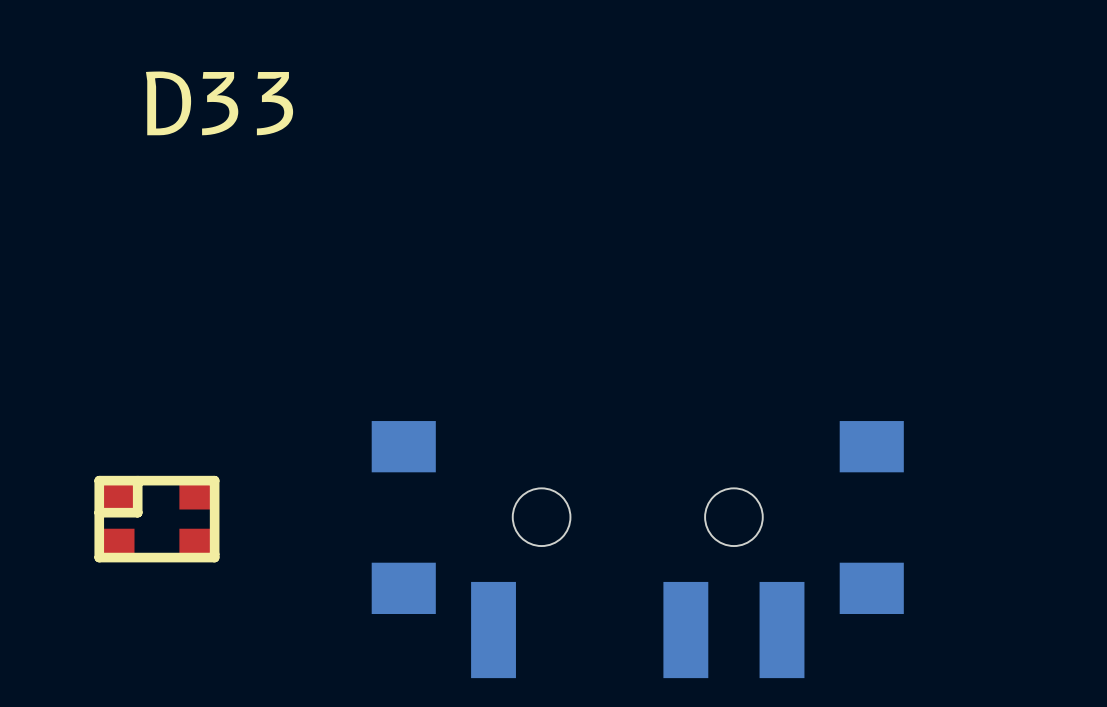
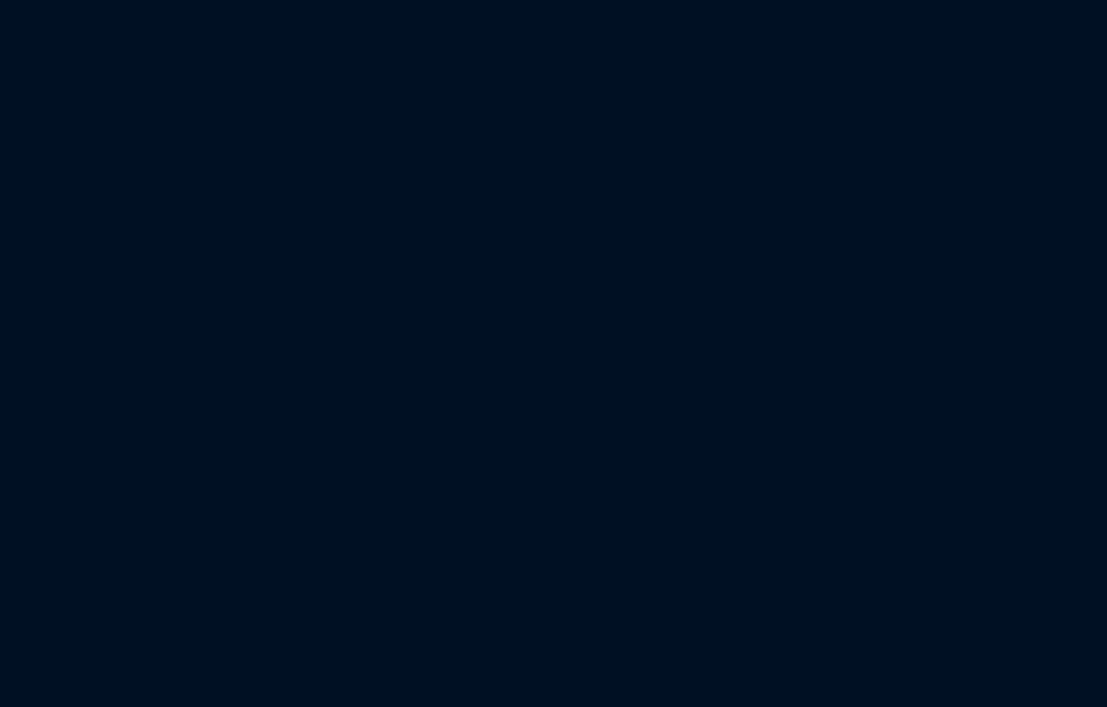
D33: (156, 519) -> none
part: (637, 549) -> none

